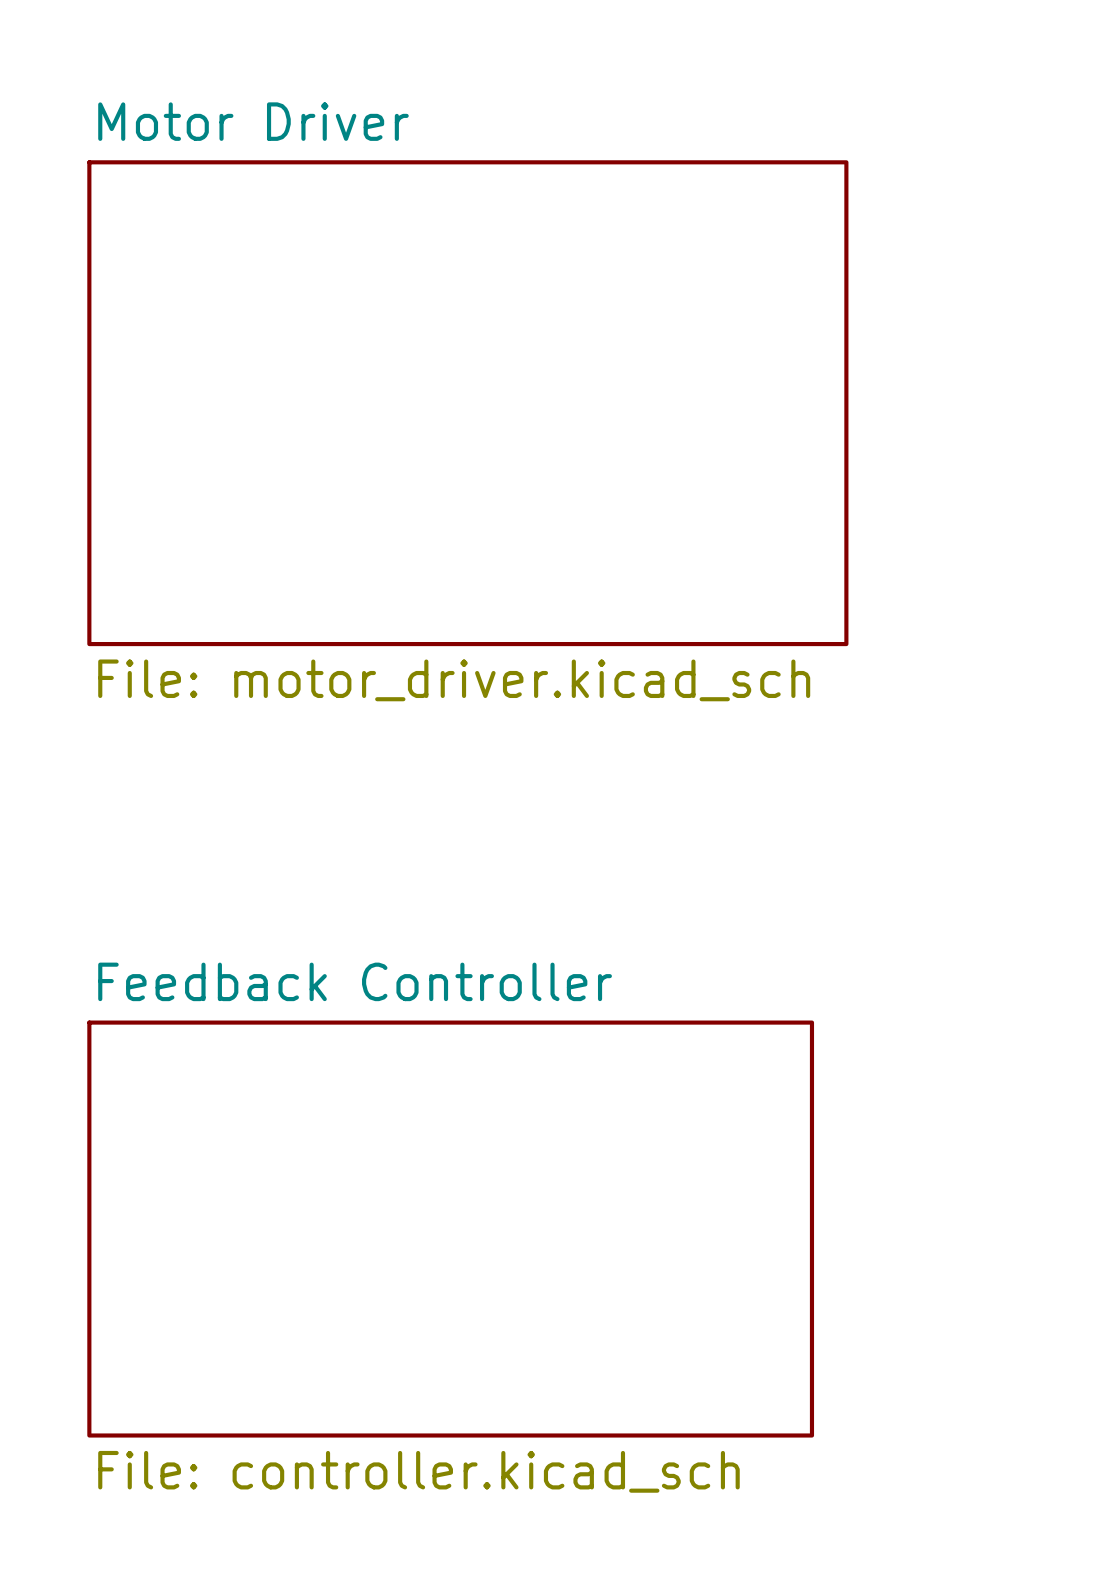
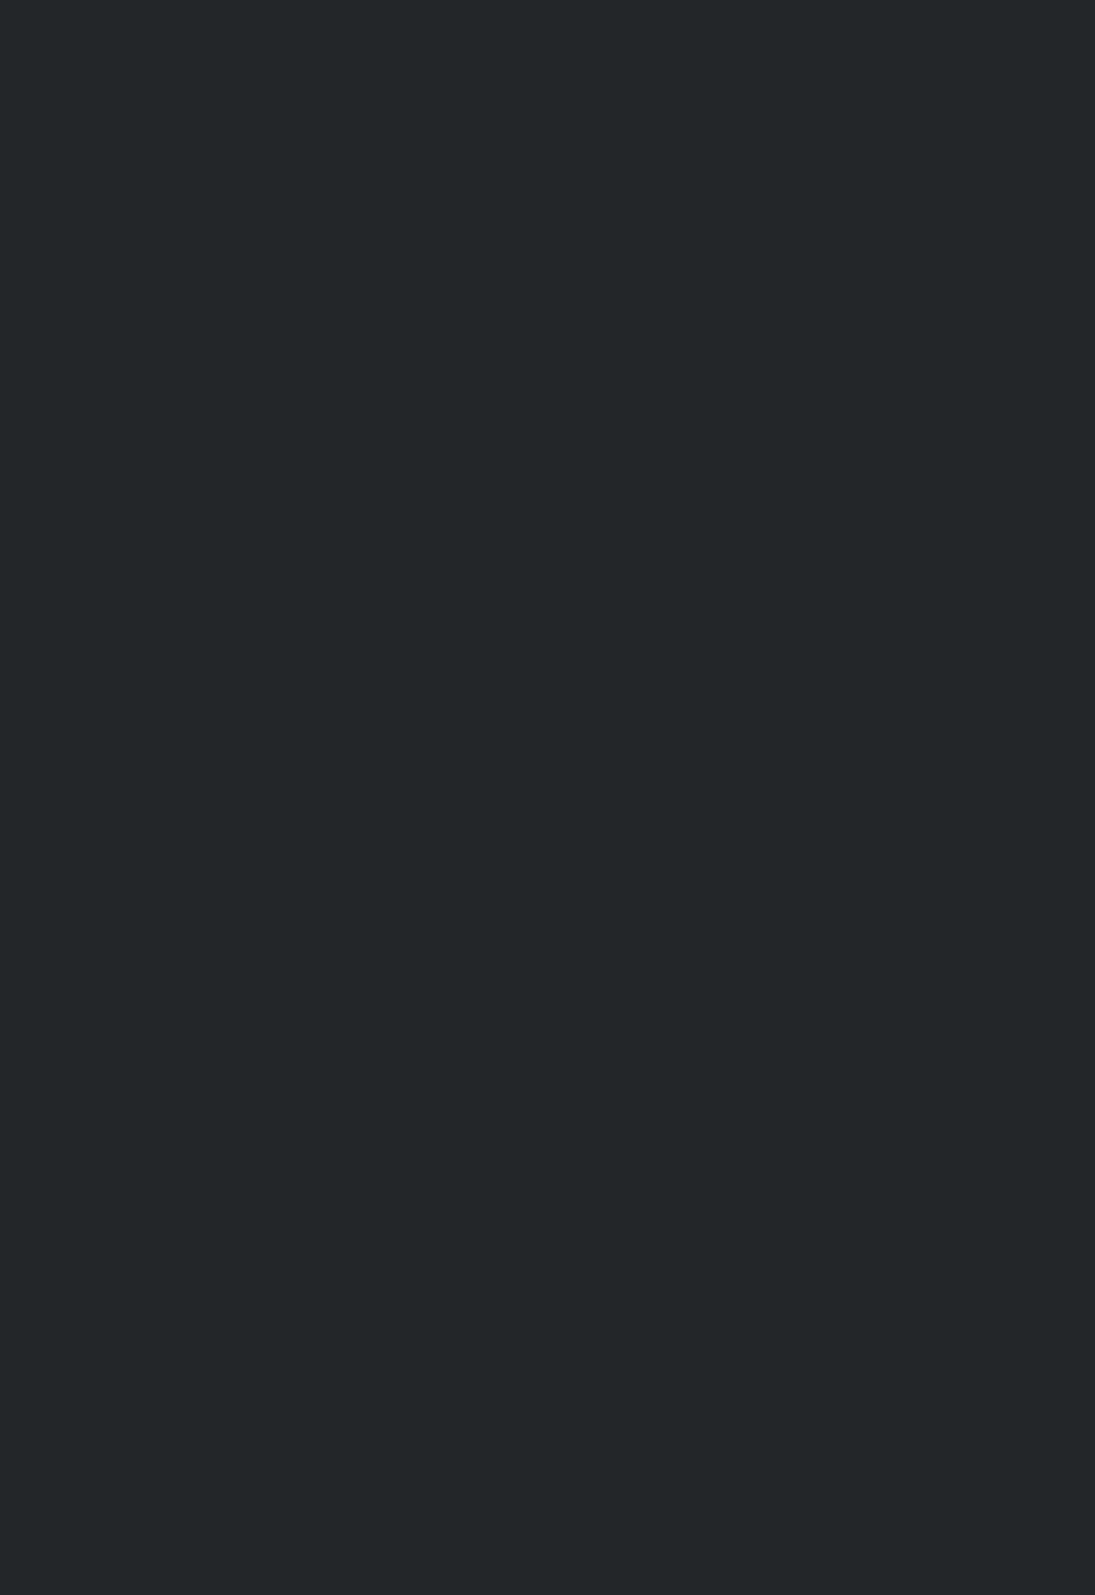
sheet Motor Driver: File: motor_driver.kicad_sch (467, 403) -> none
sheet Feedback Controller: File: controller.kicad_sch (450, 1229) -> none

